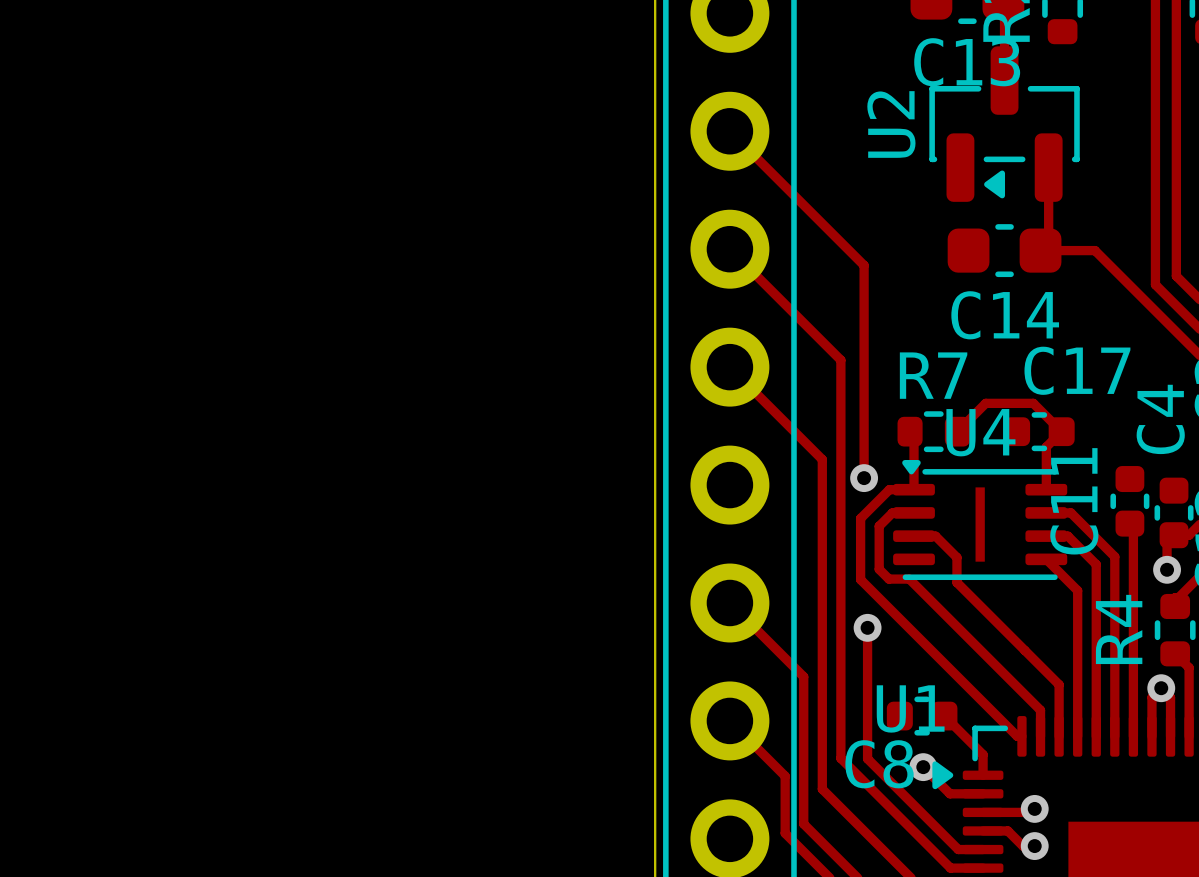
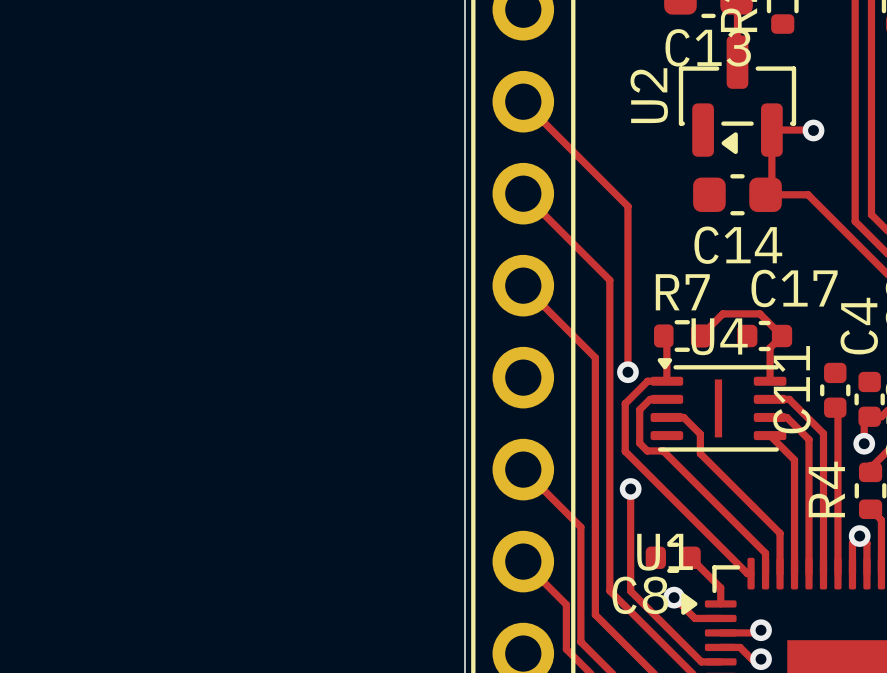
track: none -> (771, 130) (813, 130)
via: none -> (813, 130)

